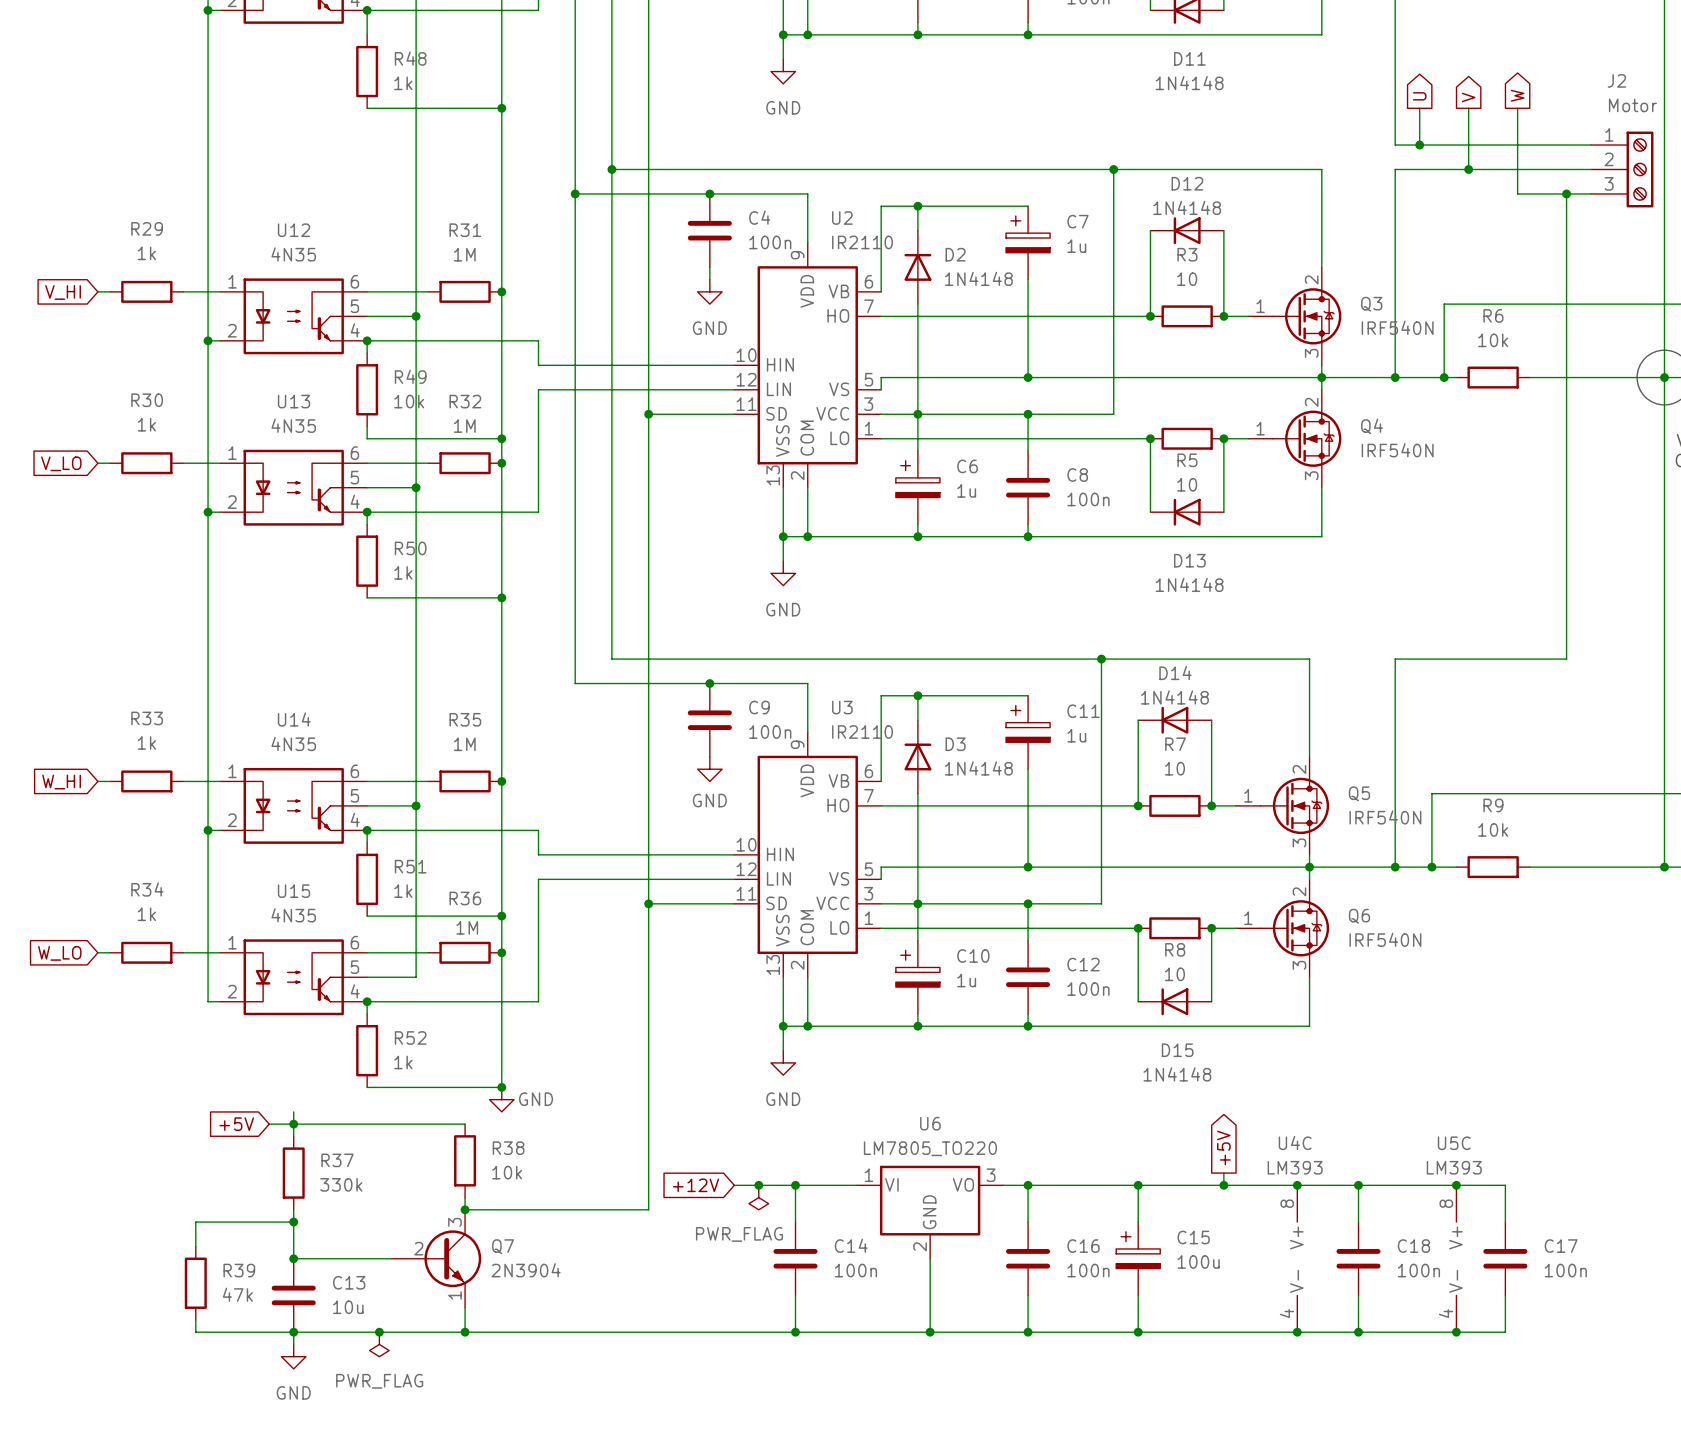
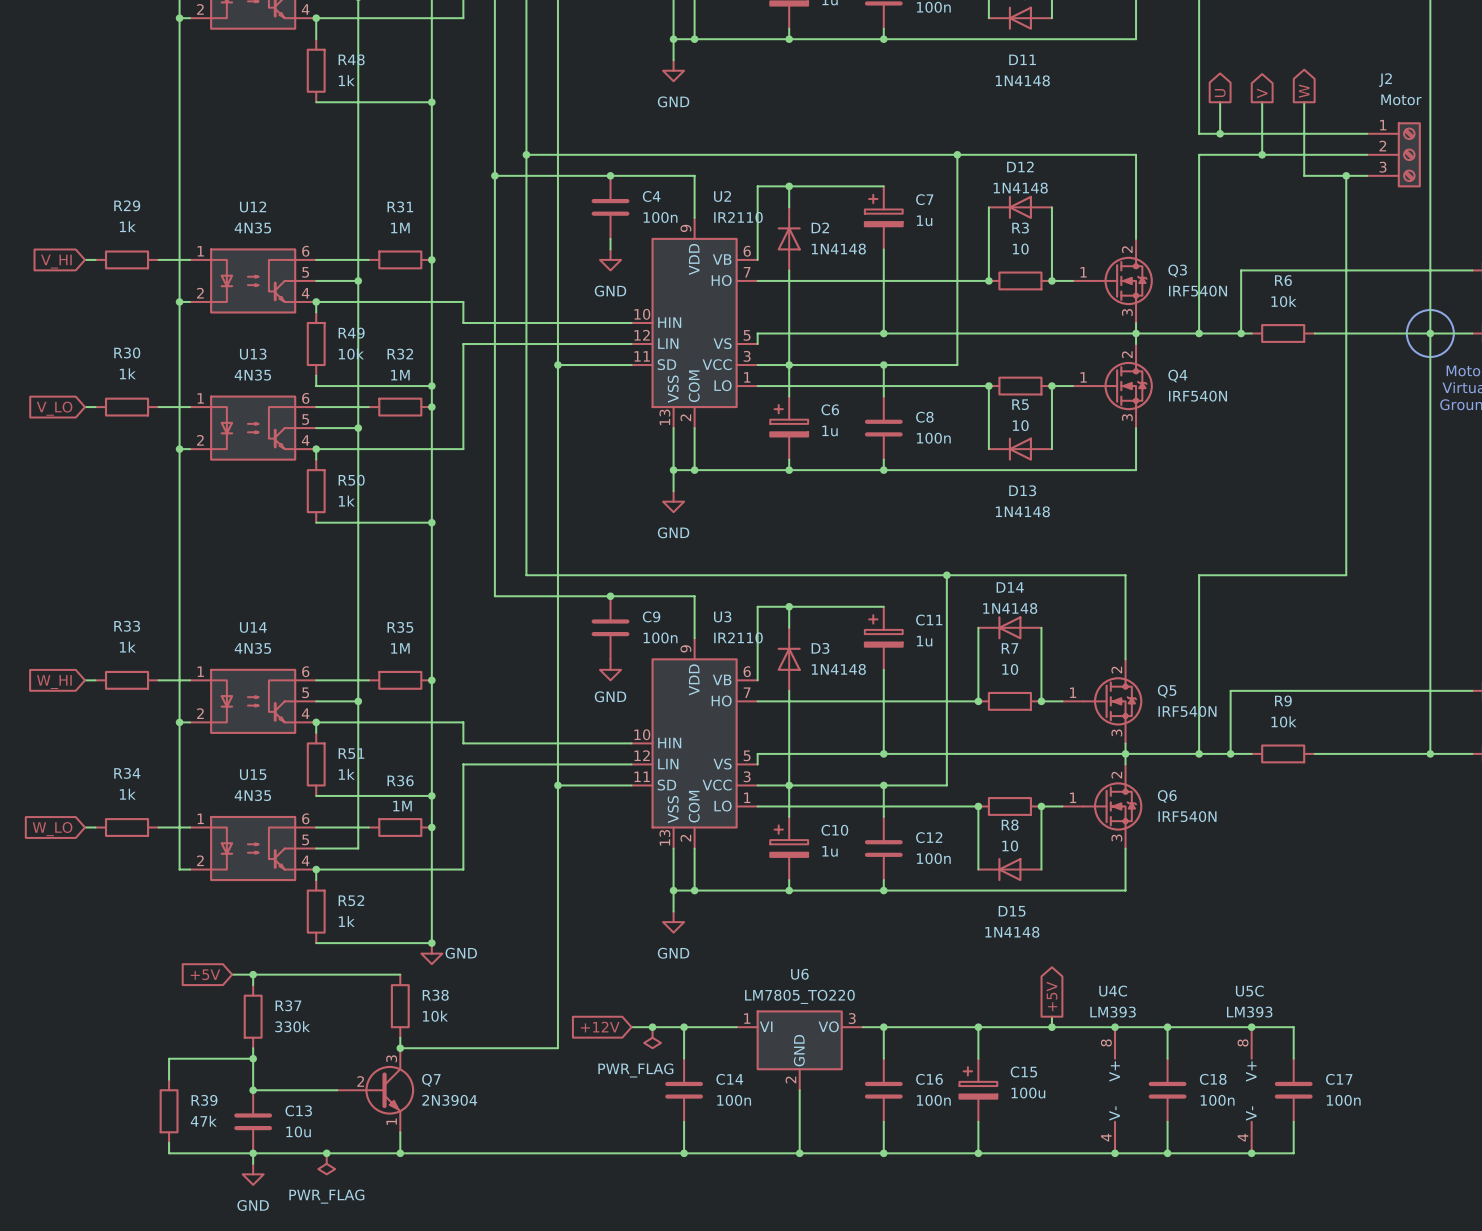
wire: (293, 1111) (293, 1124) -> none

